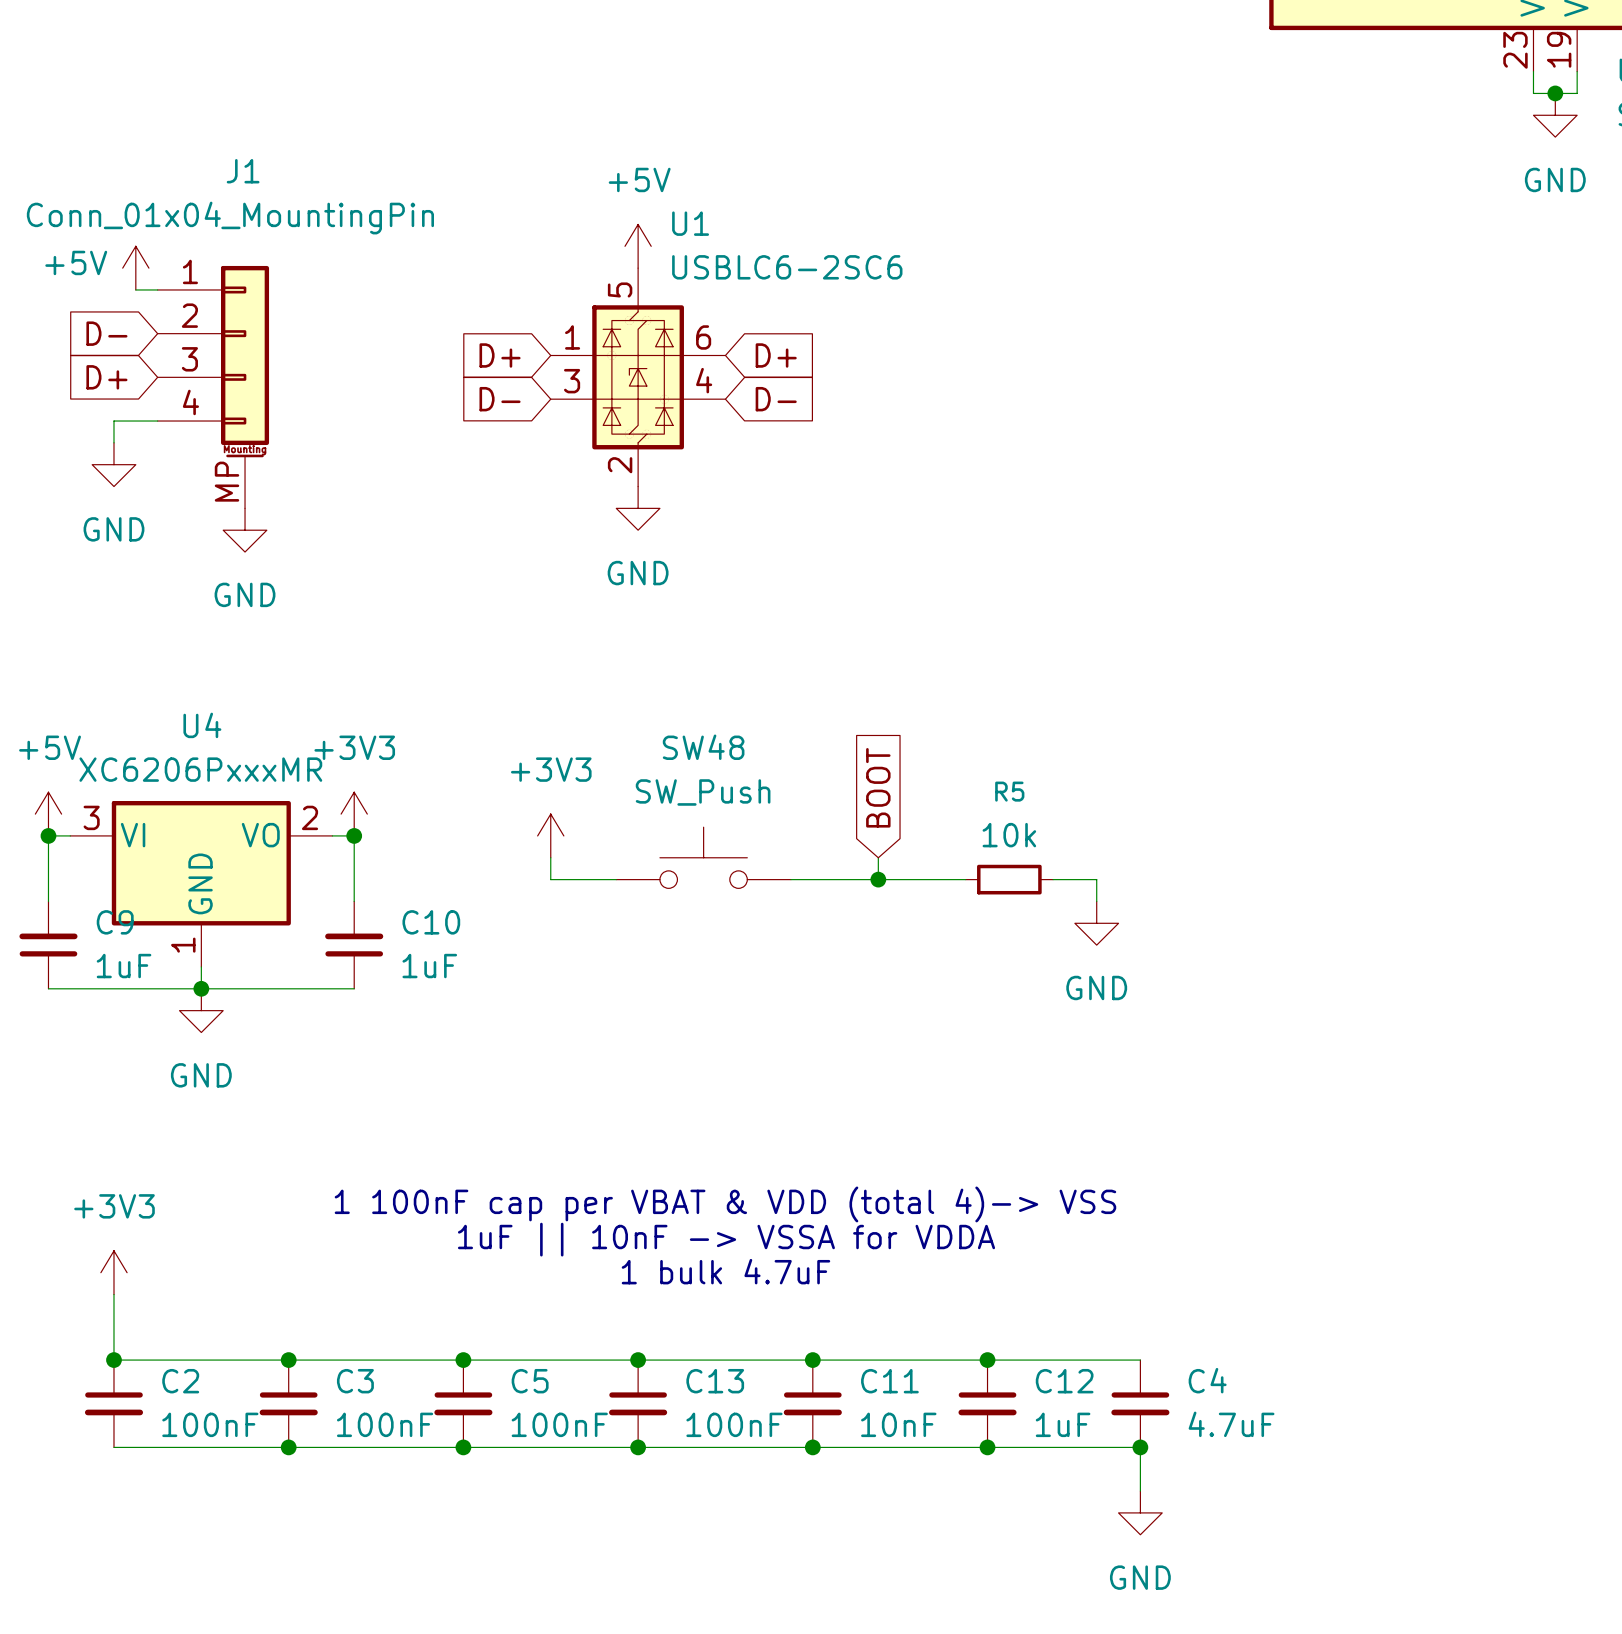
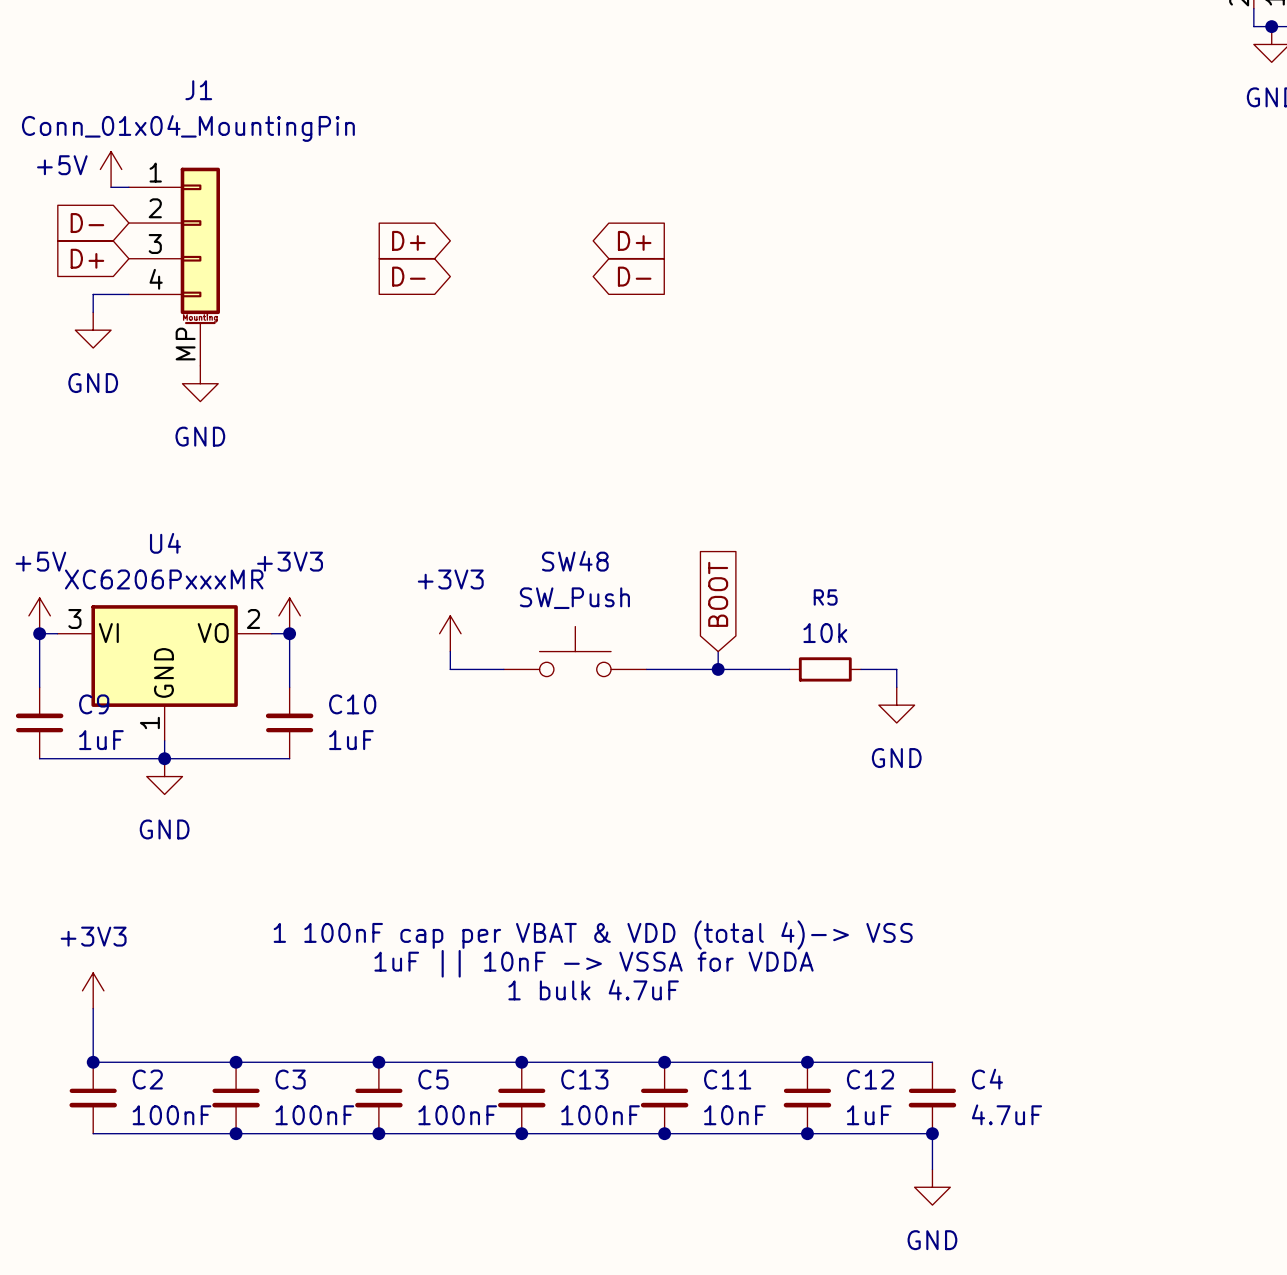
power symbol: +5V (638, 246) -> none
U1: USBLC6-2SC6 (638, 377) -> none
power symbol: GND (638, 508) -> none

